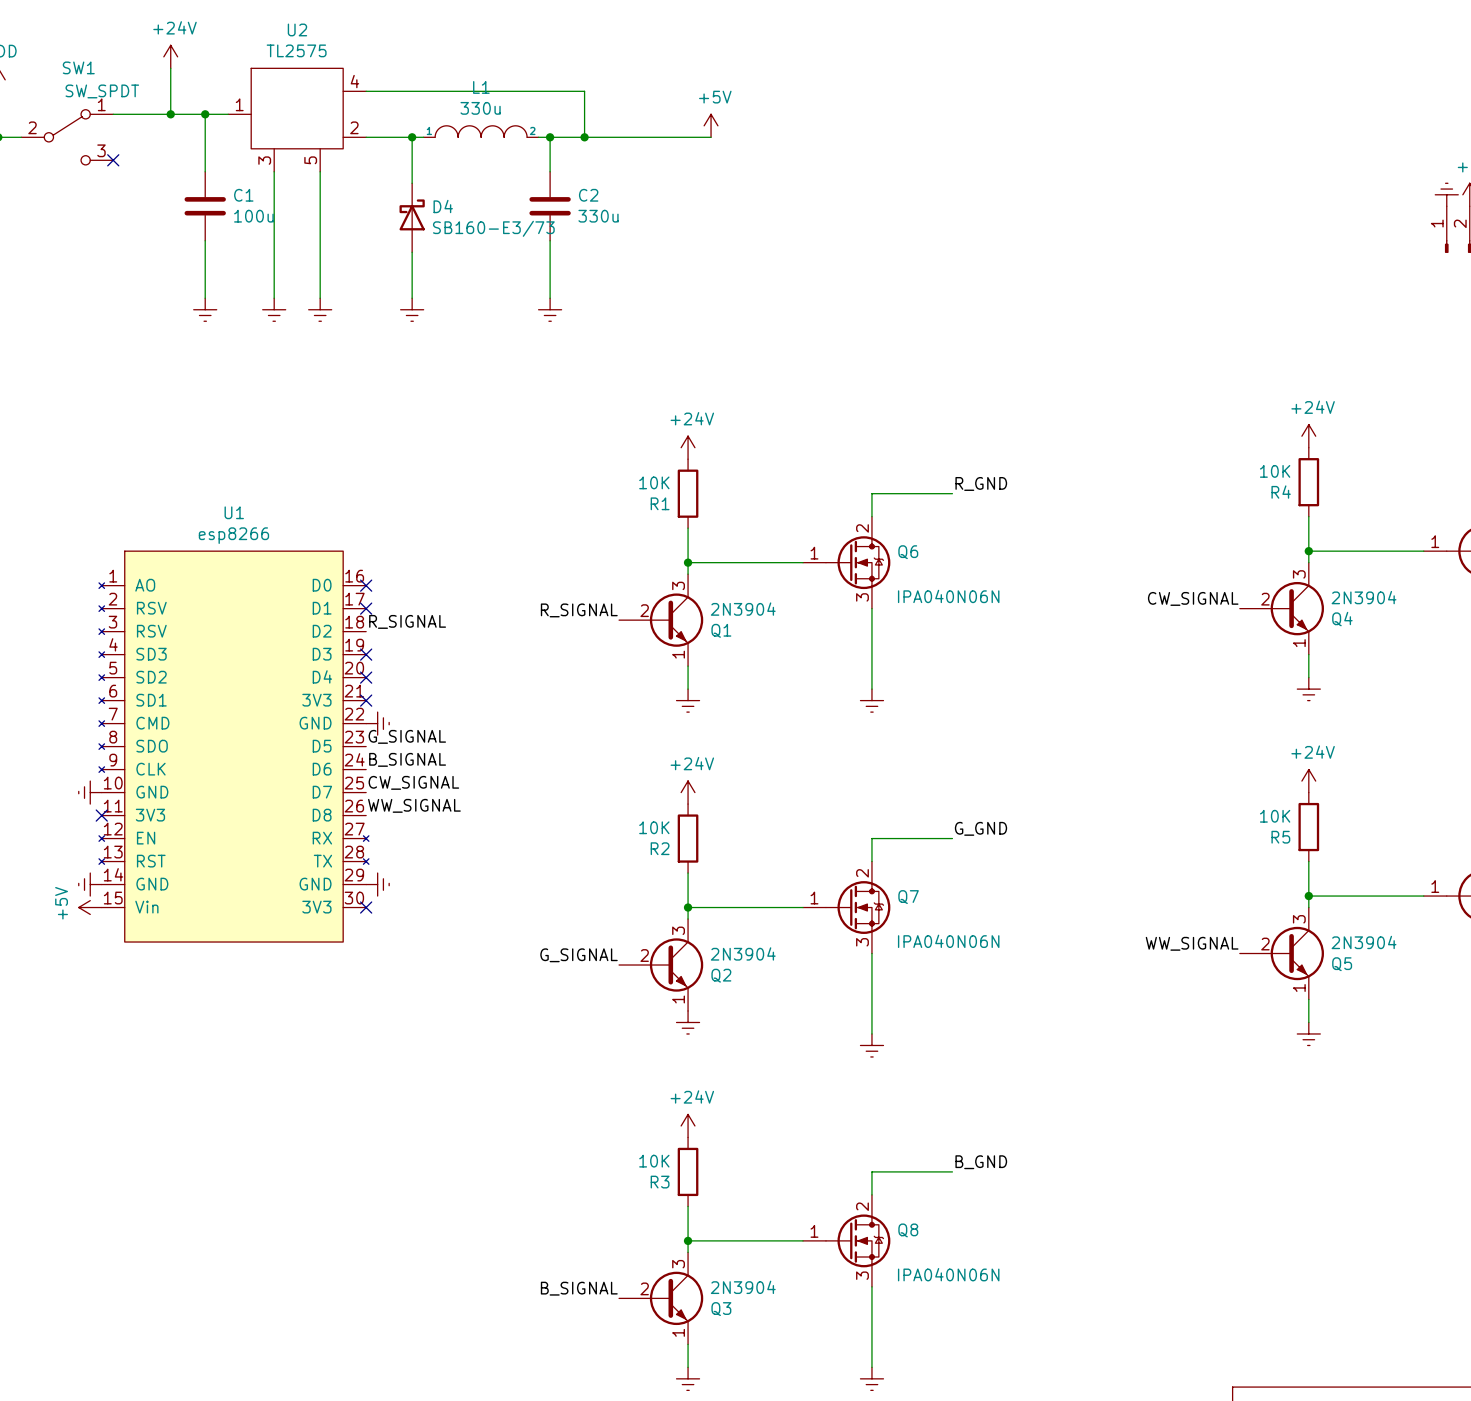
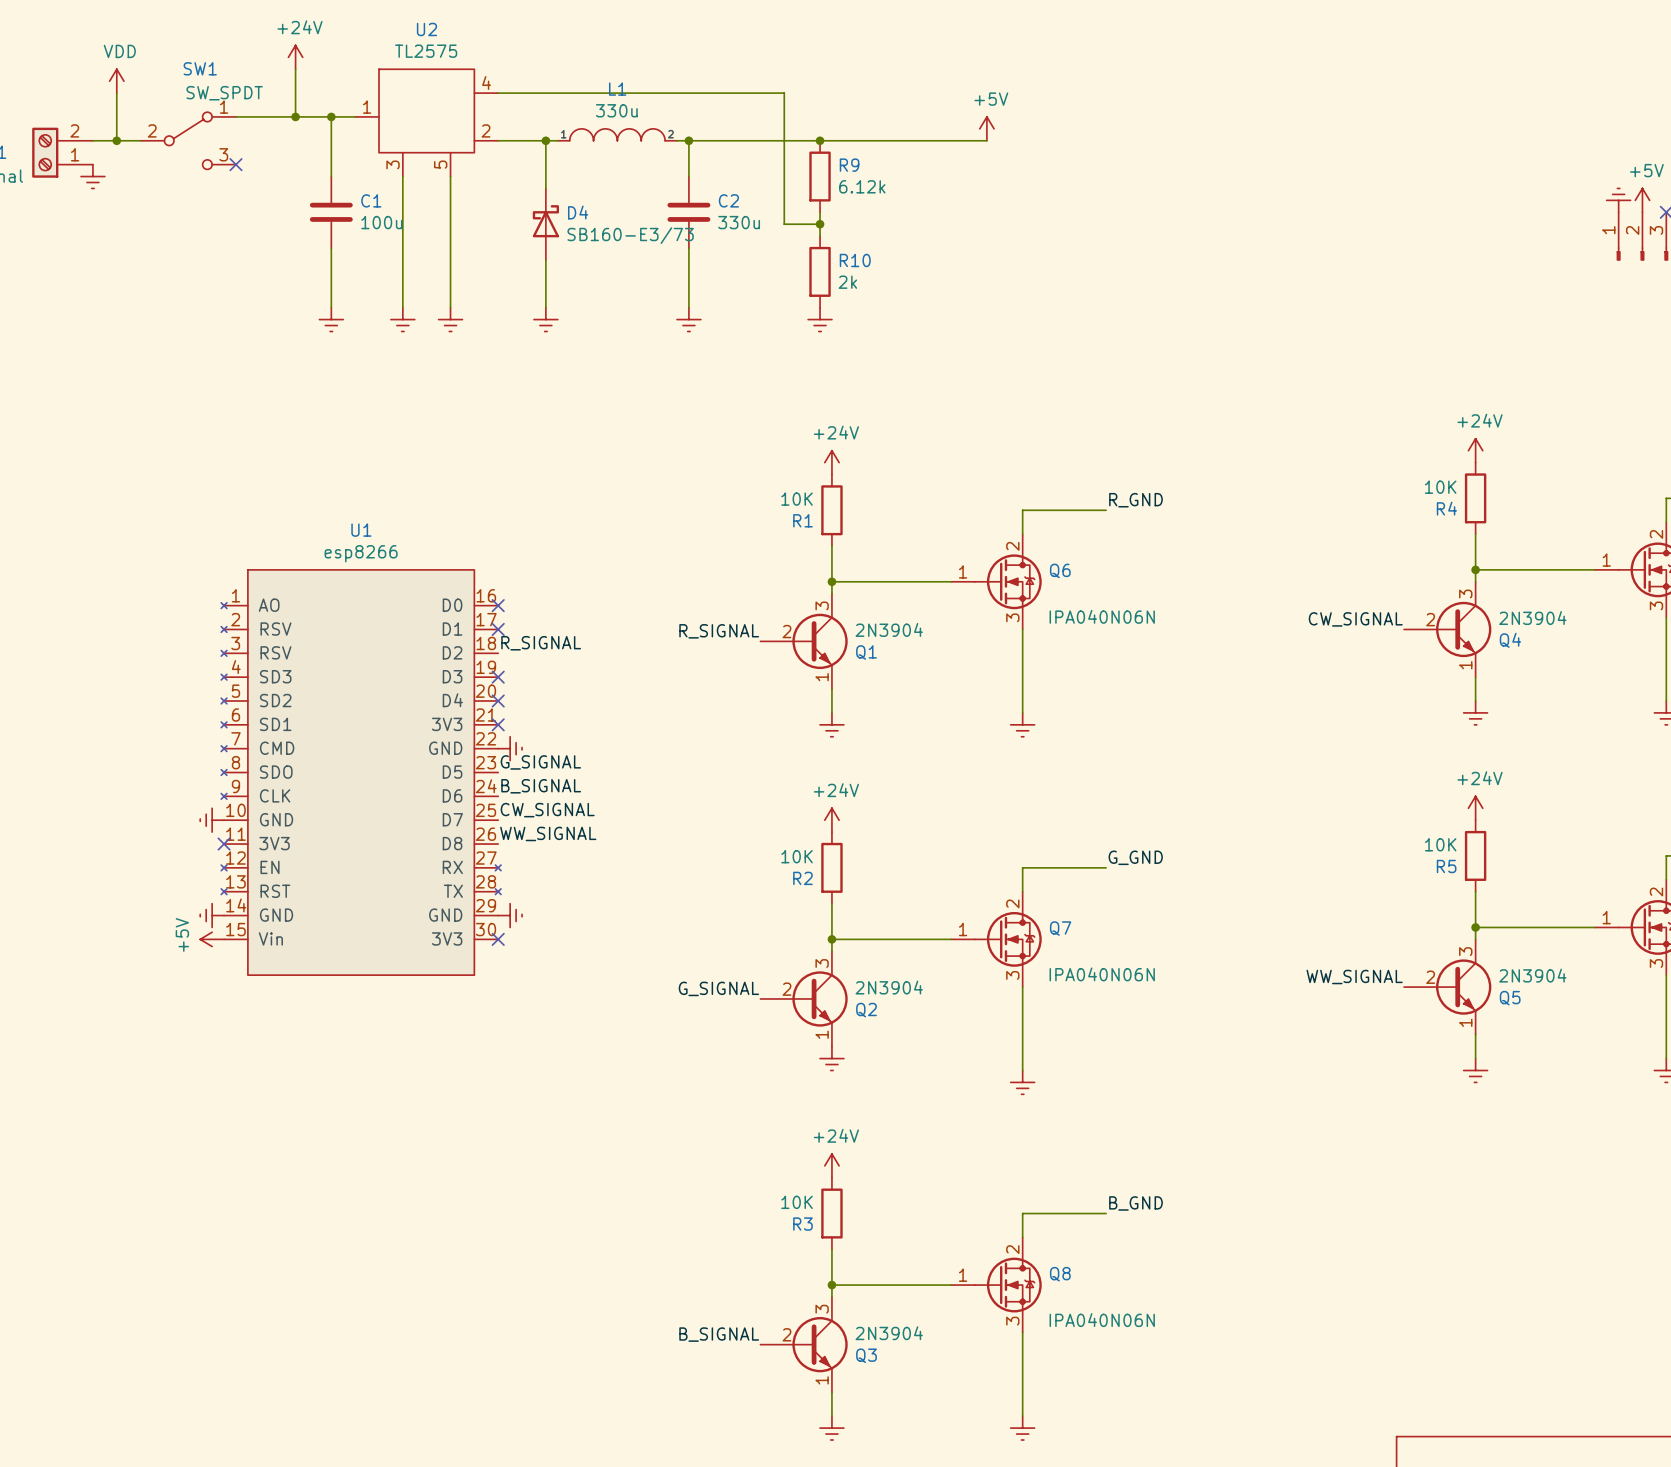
wire: (584, 91) (584, 137) -> (724, 93) (784, 93) (784, 224) (820, 224)
power symbol position: +5V (711, 125) -> +5V (986, 128)
junction: (584, 137) -> none
junction: none -> (820, 140)
wire: none -> (855, 140) (986, 140)
R9: none -> 6.12k (820, 176)
wire: none -> (820, 212) (820, 236)
junction: none -> (820, 224)
R10: none -> 2k (820, 271)
power symbol: none -> (820, 319)

